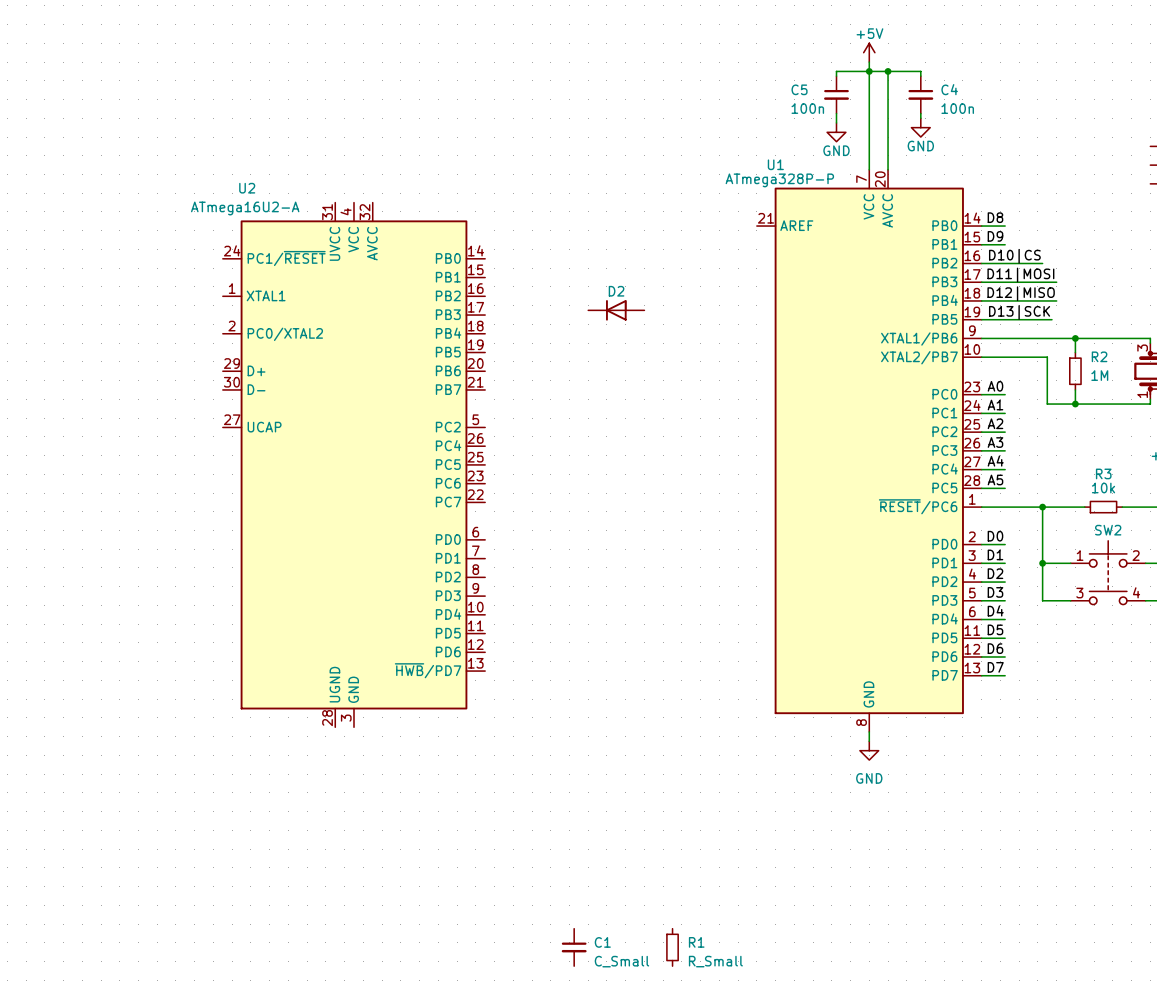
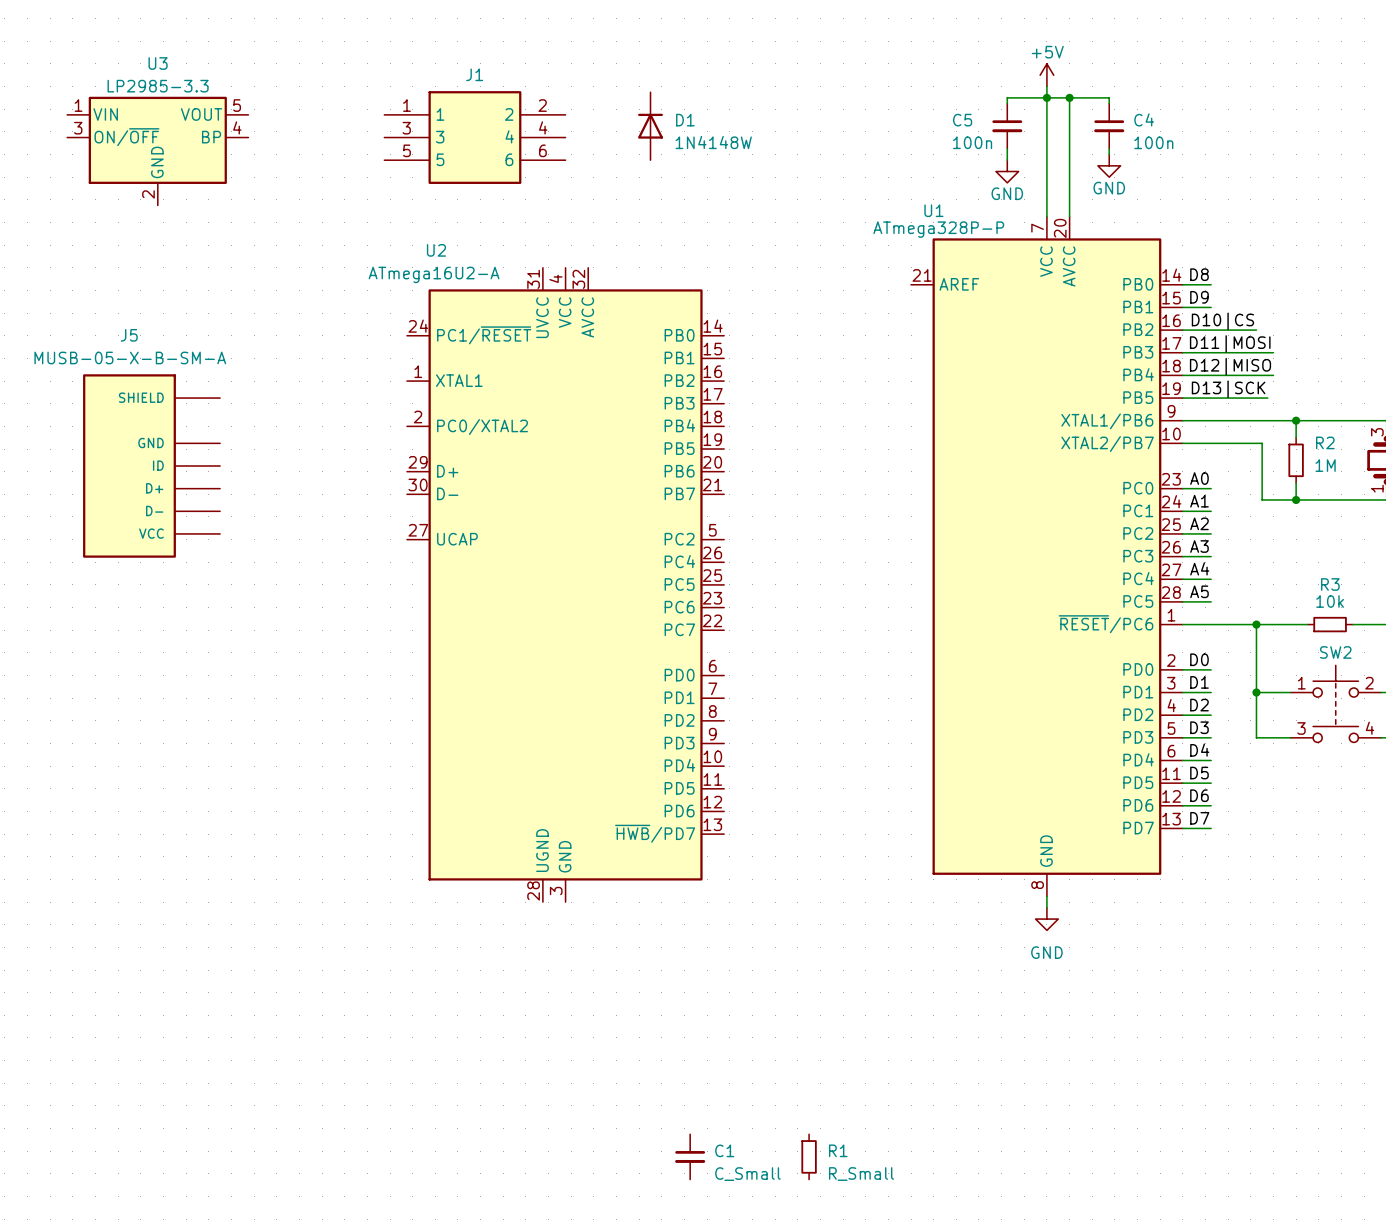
D1: none -> 1N4148W (650, 126)
J1: none -> (474, 137)
U3: none -> LP2985-3.3 (157, 151)
D2: (616, 310) -> none
J5: none -> MUSB-05-X-B-SM-A (151, 466)
U2 position: (353, 464) -> (565, 584)

